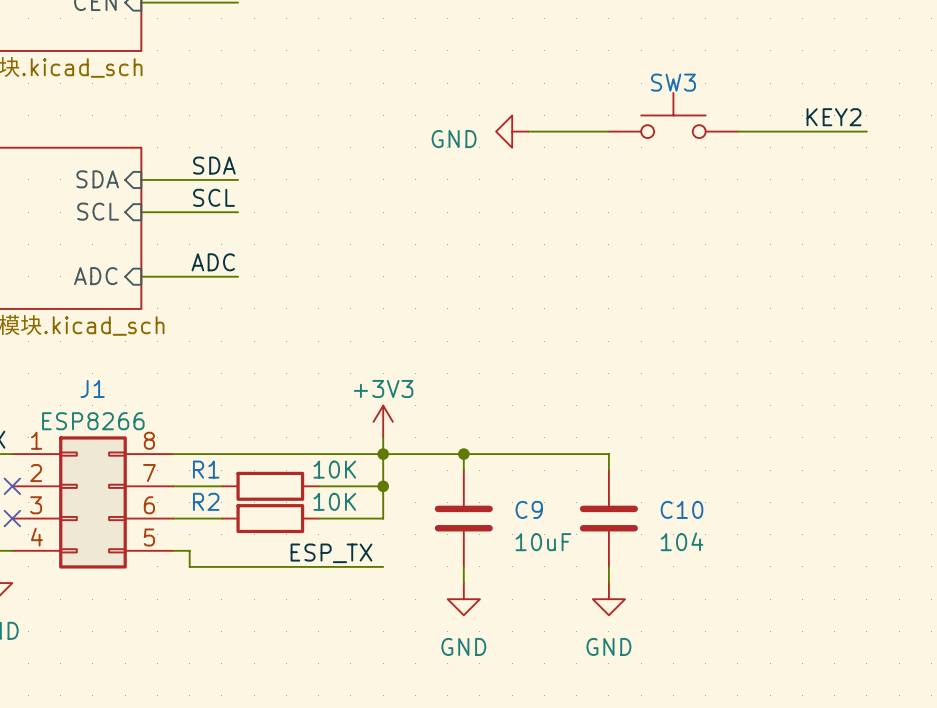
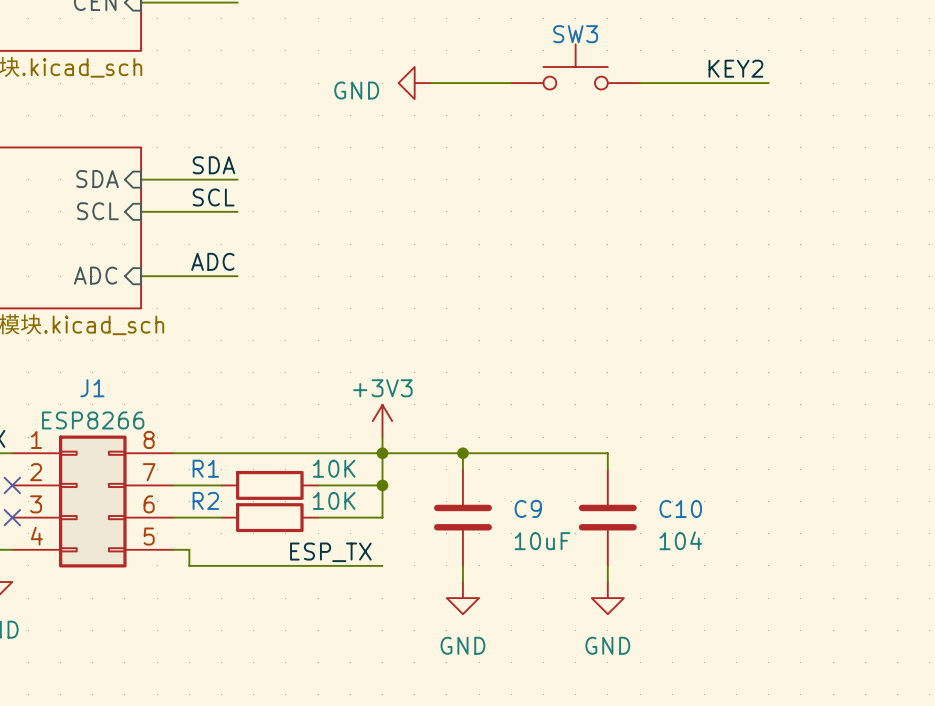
SW3 position: (673, 115) -> (575, 66)
label position: KEY2 (834, 117) -> KEY2 (735, 68)
power symbol position: GND (512, 131) -> GND (414, 83)
wire: (528, 131) (608, 131) -> (430, 83) (511, 83)
wire: (737, 131) (866, 131) -> (640, 83) (768, 83)

